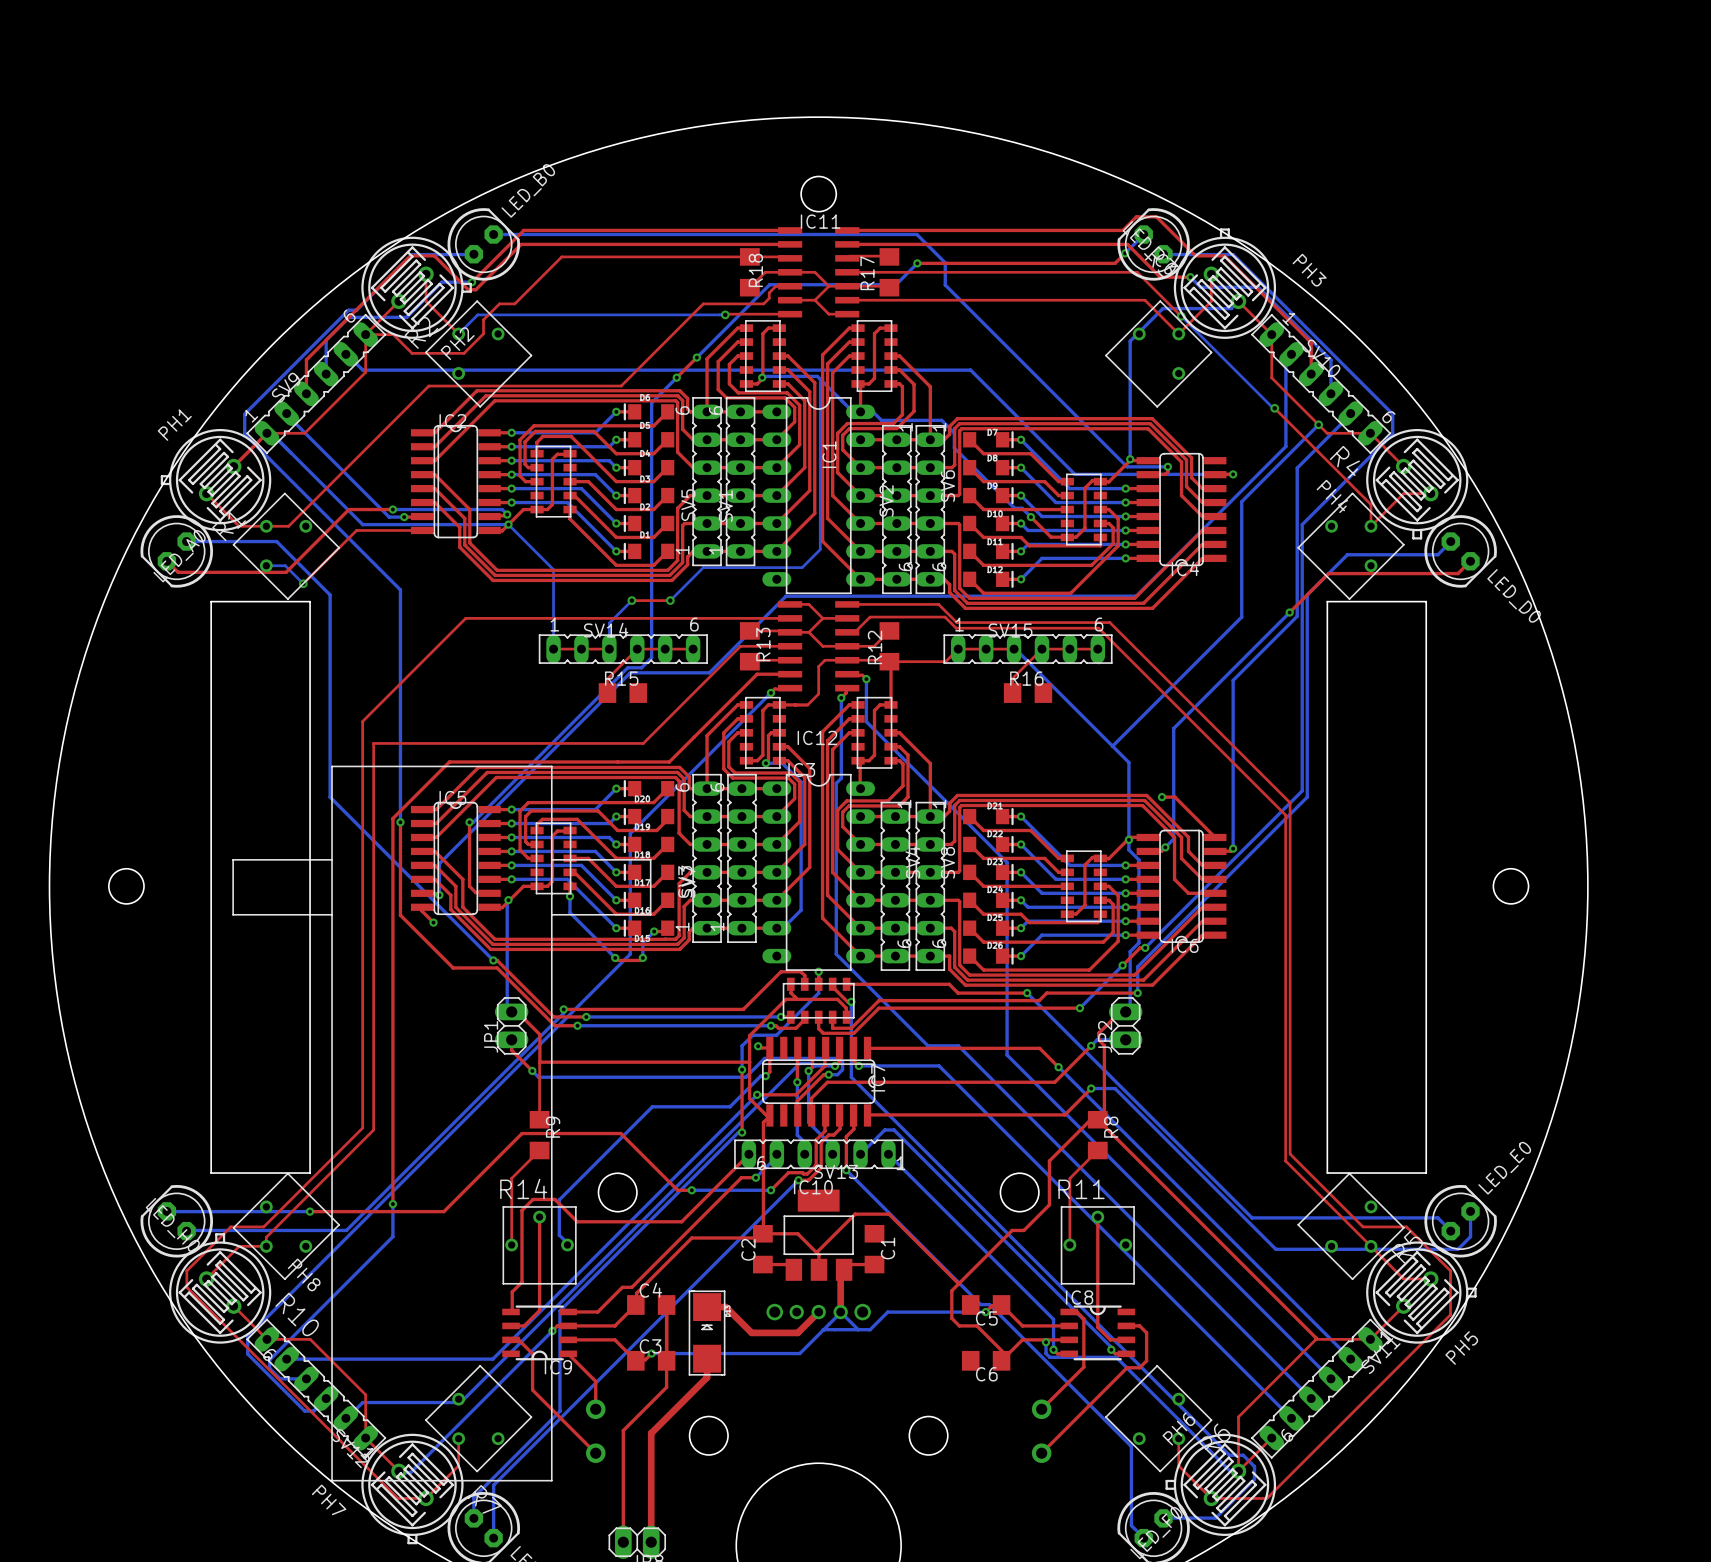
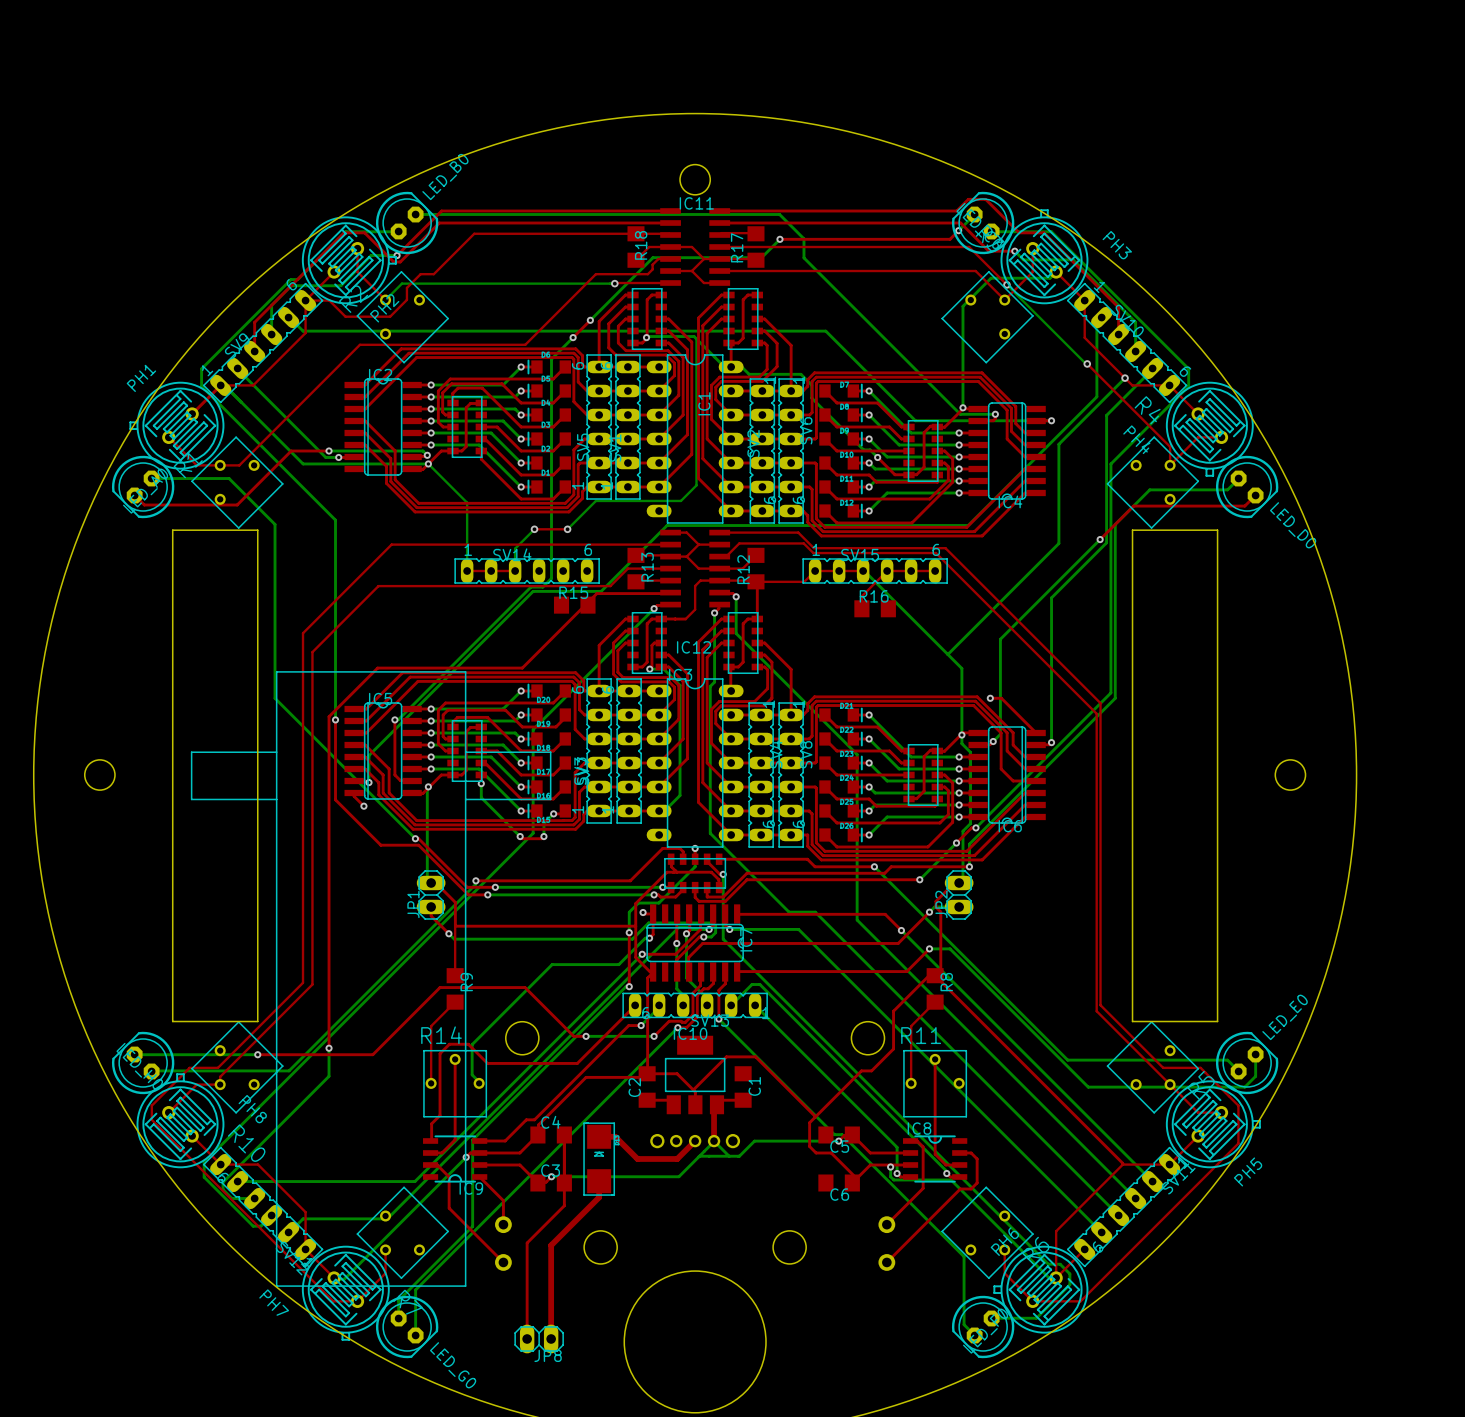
top track: (422, 530) (356, 530) (303, 583) -> none
bottom track: (266, 565) (285, 565) (303, 583) -> none
via: (303, 583) -> none
top track: (693, 649) (637, 649) (607, 678) (607, 693) -> none
top track: (720, 666) (643, 743) (373, 743) -> (610, 586) (378, 586) (312, 652)
top track: (790, 674) (757, 674) (669, 761) (617, 761) -> (670, 592) (596, 593) (522, 668)
R15 position: (622, 693) -> (574, 605)

